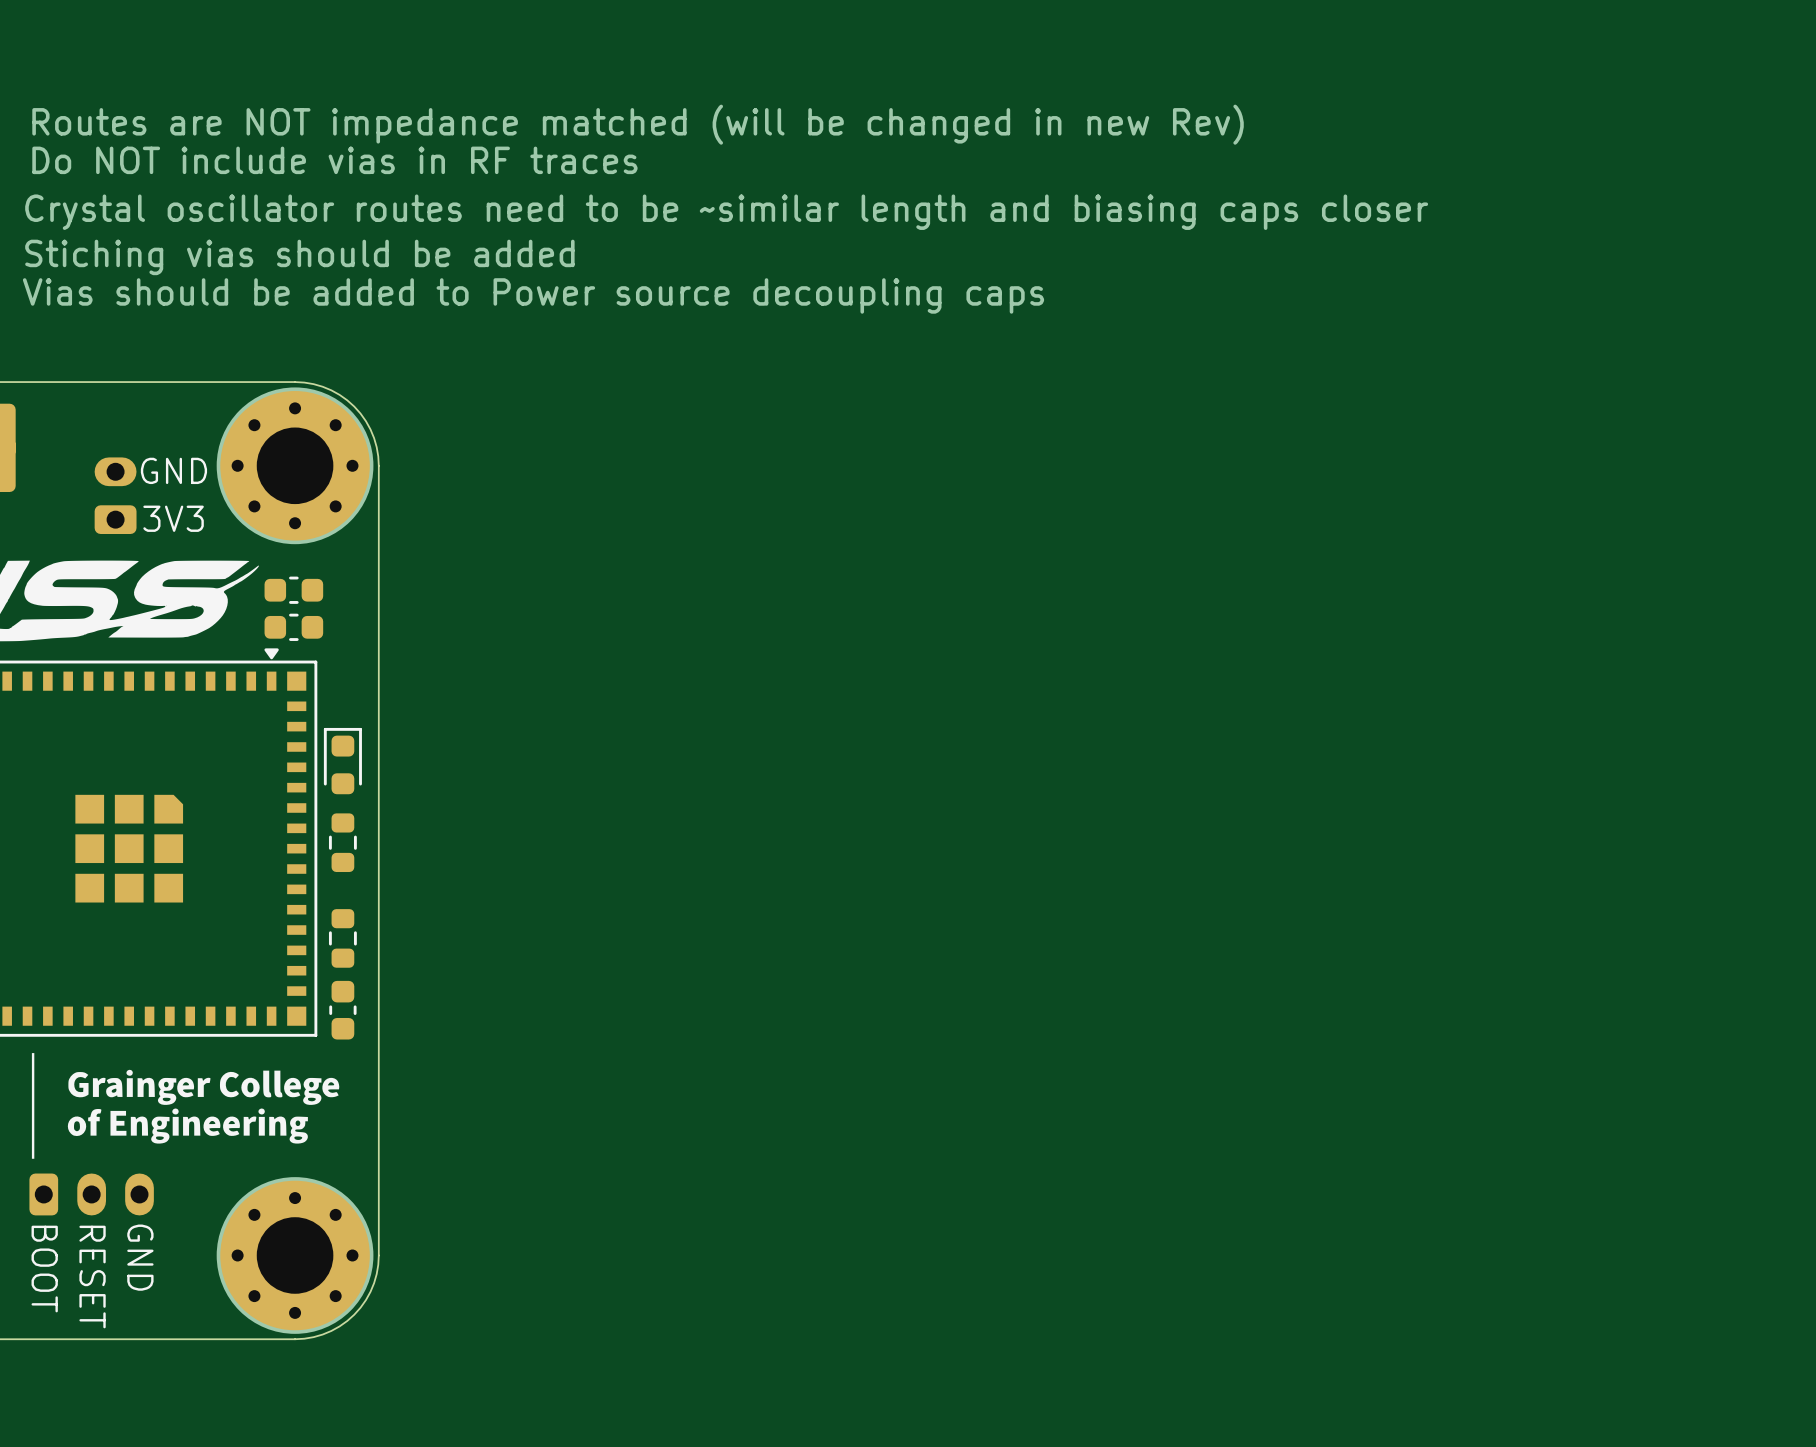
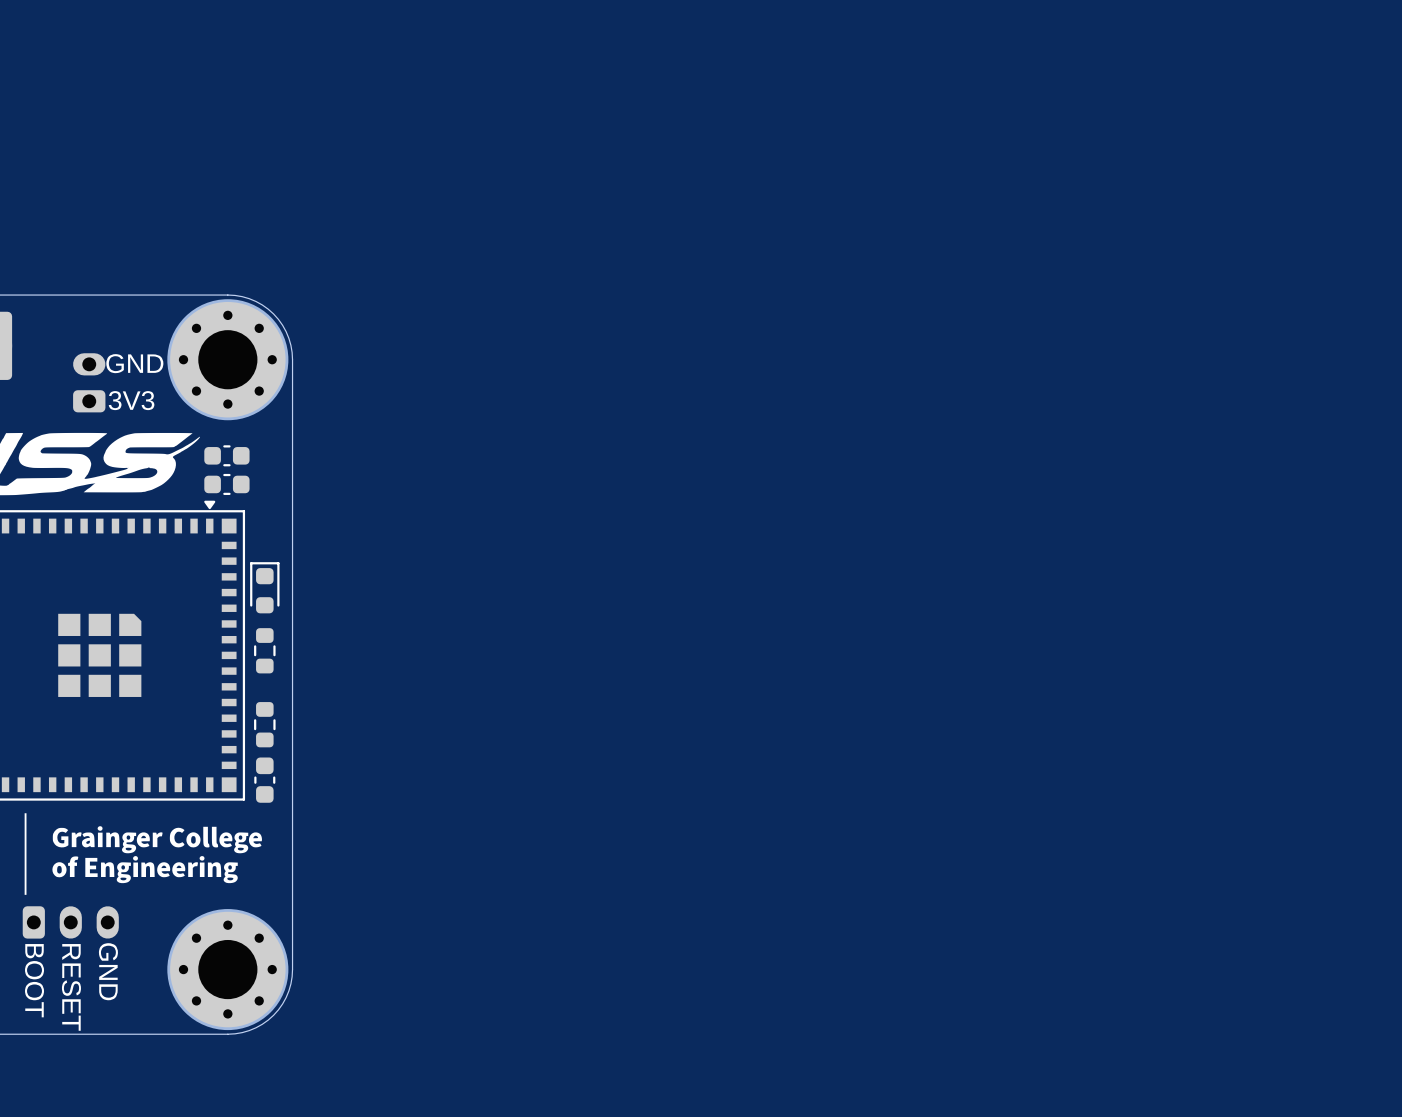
text: Routes are NOT impedance matched (will be changed in new Rev) (638, 124) -> none
text: Do NOT include vias in RF traces (334, 160) -> none
text: Crystal oscillator routes need to be ~similar length and biasing caps closer (726, 212) -> none
text: Stiching vias should be added (299, 257) -> none
text: Vias should be added to Power source decoupling caps (533, 295) -> none

